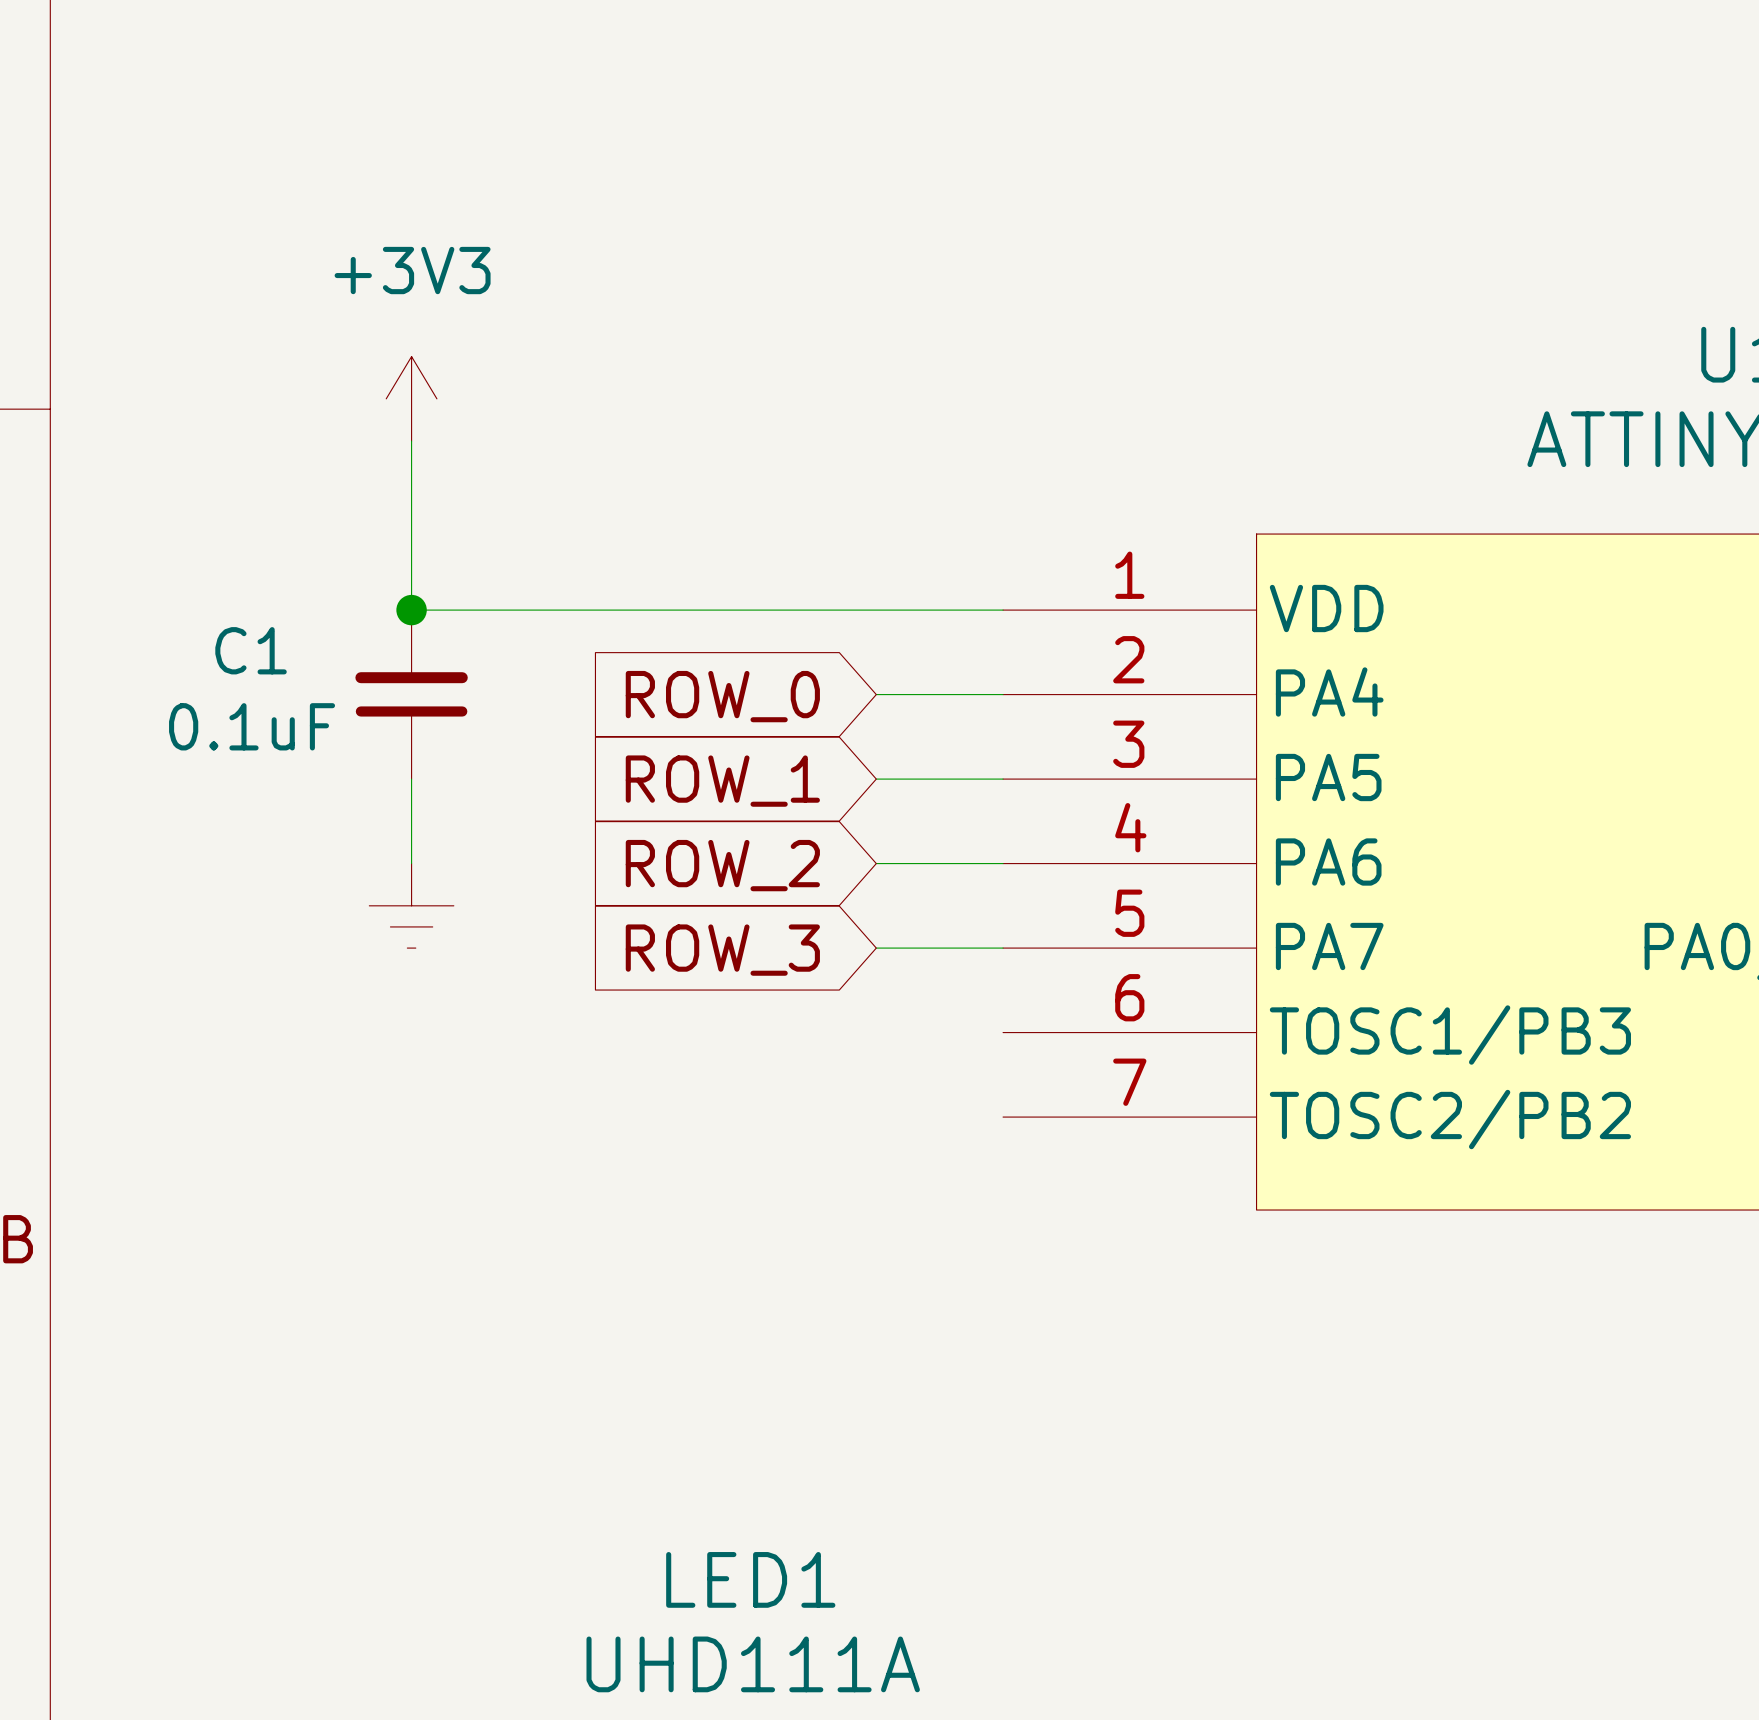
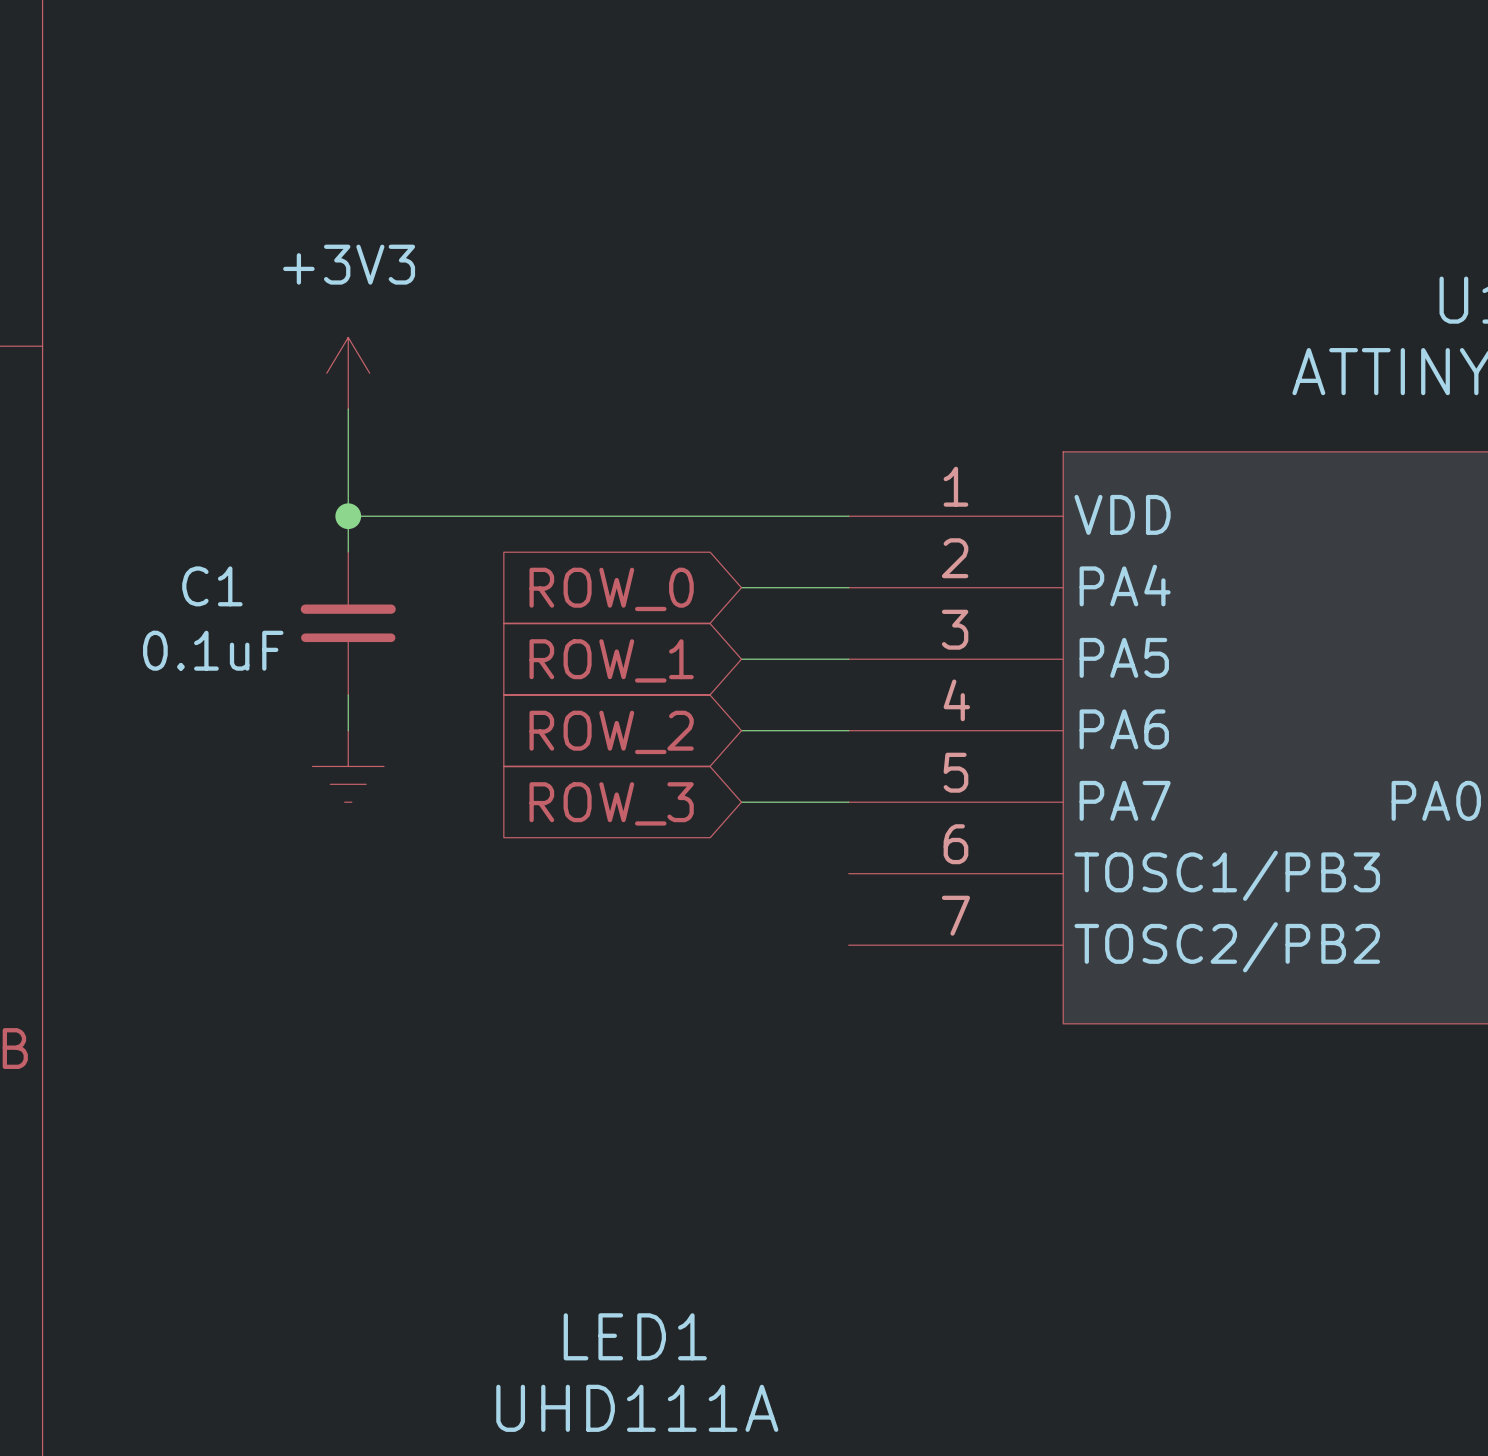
power symbol position: +3V3 (411, 398) -> +3V3 (348, 373)
C1 position: (411, 694) -> (348, 623)

